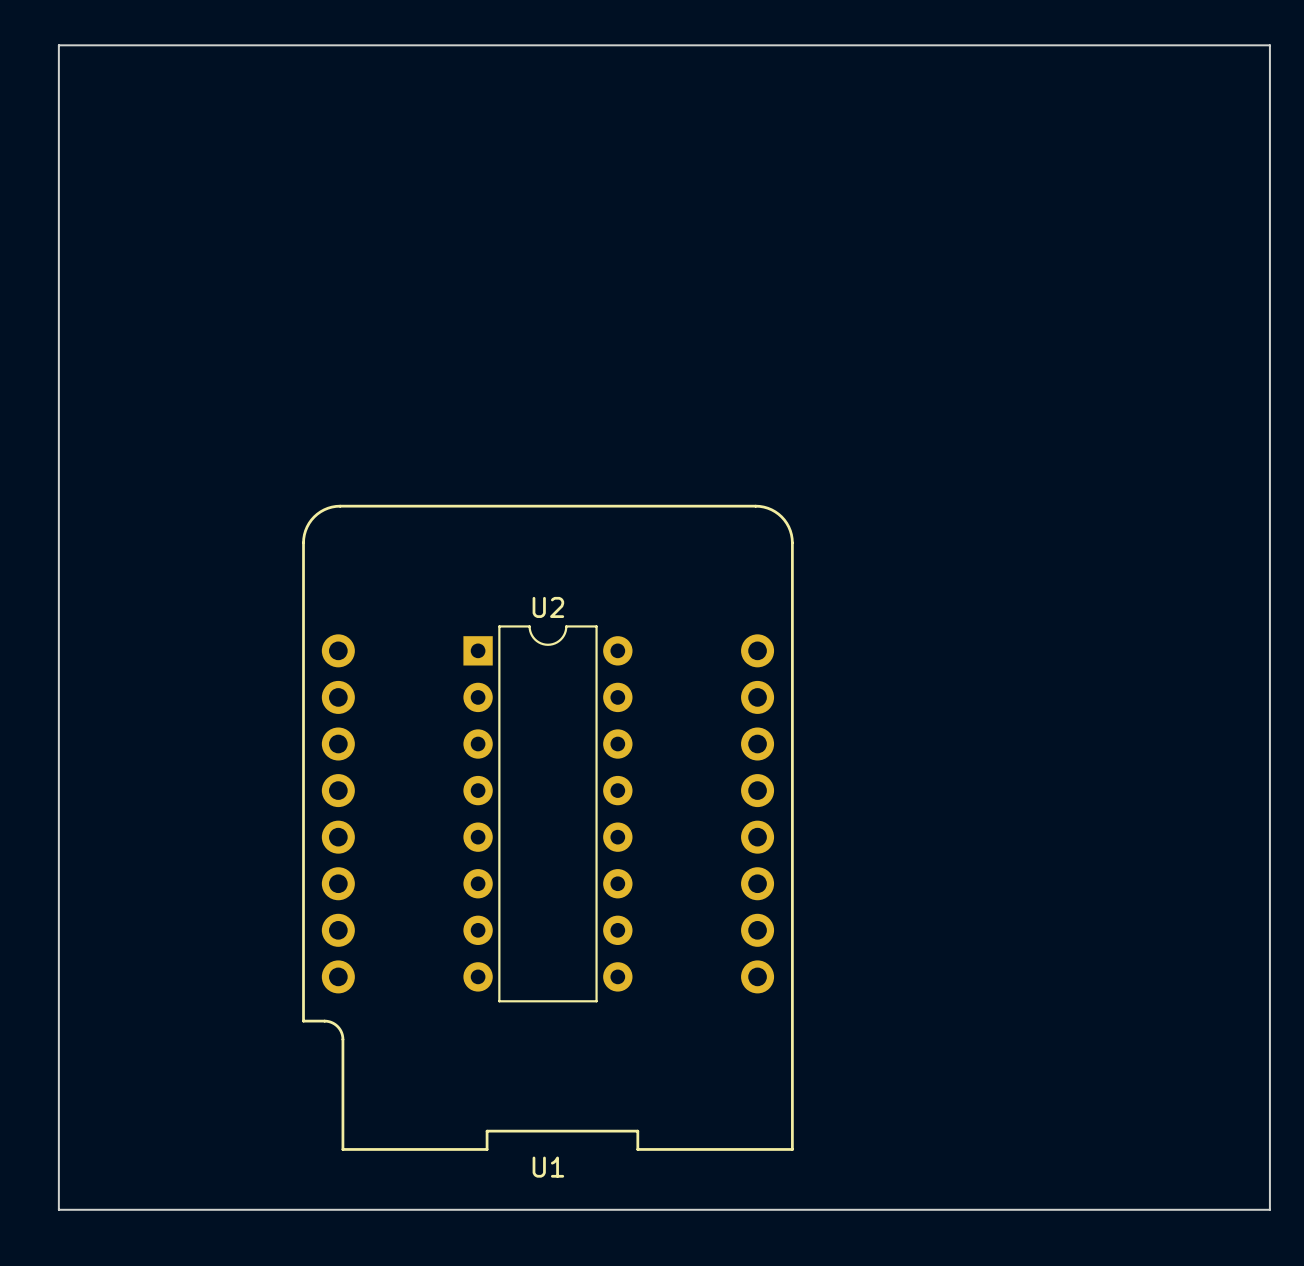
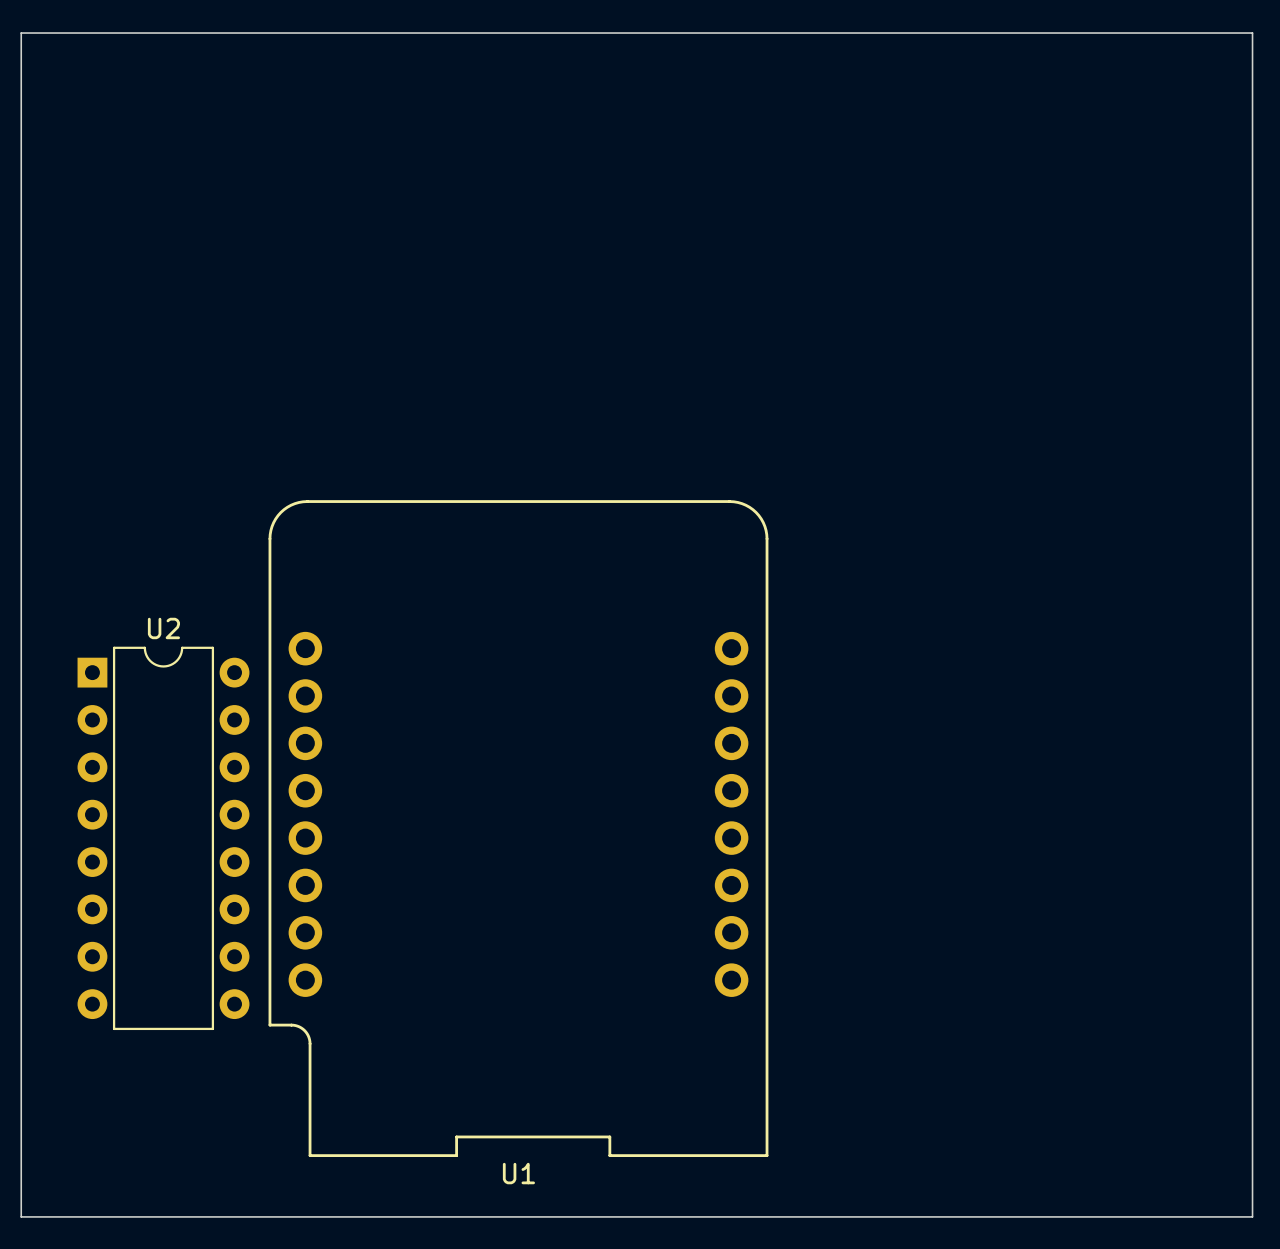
U2 position: (547, 813) -> (163, 838)

